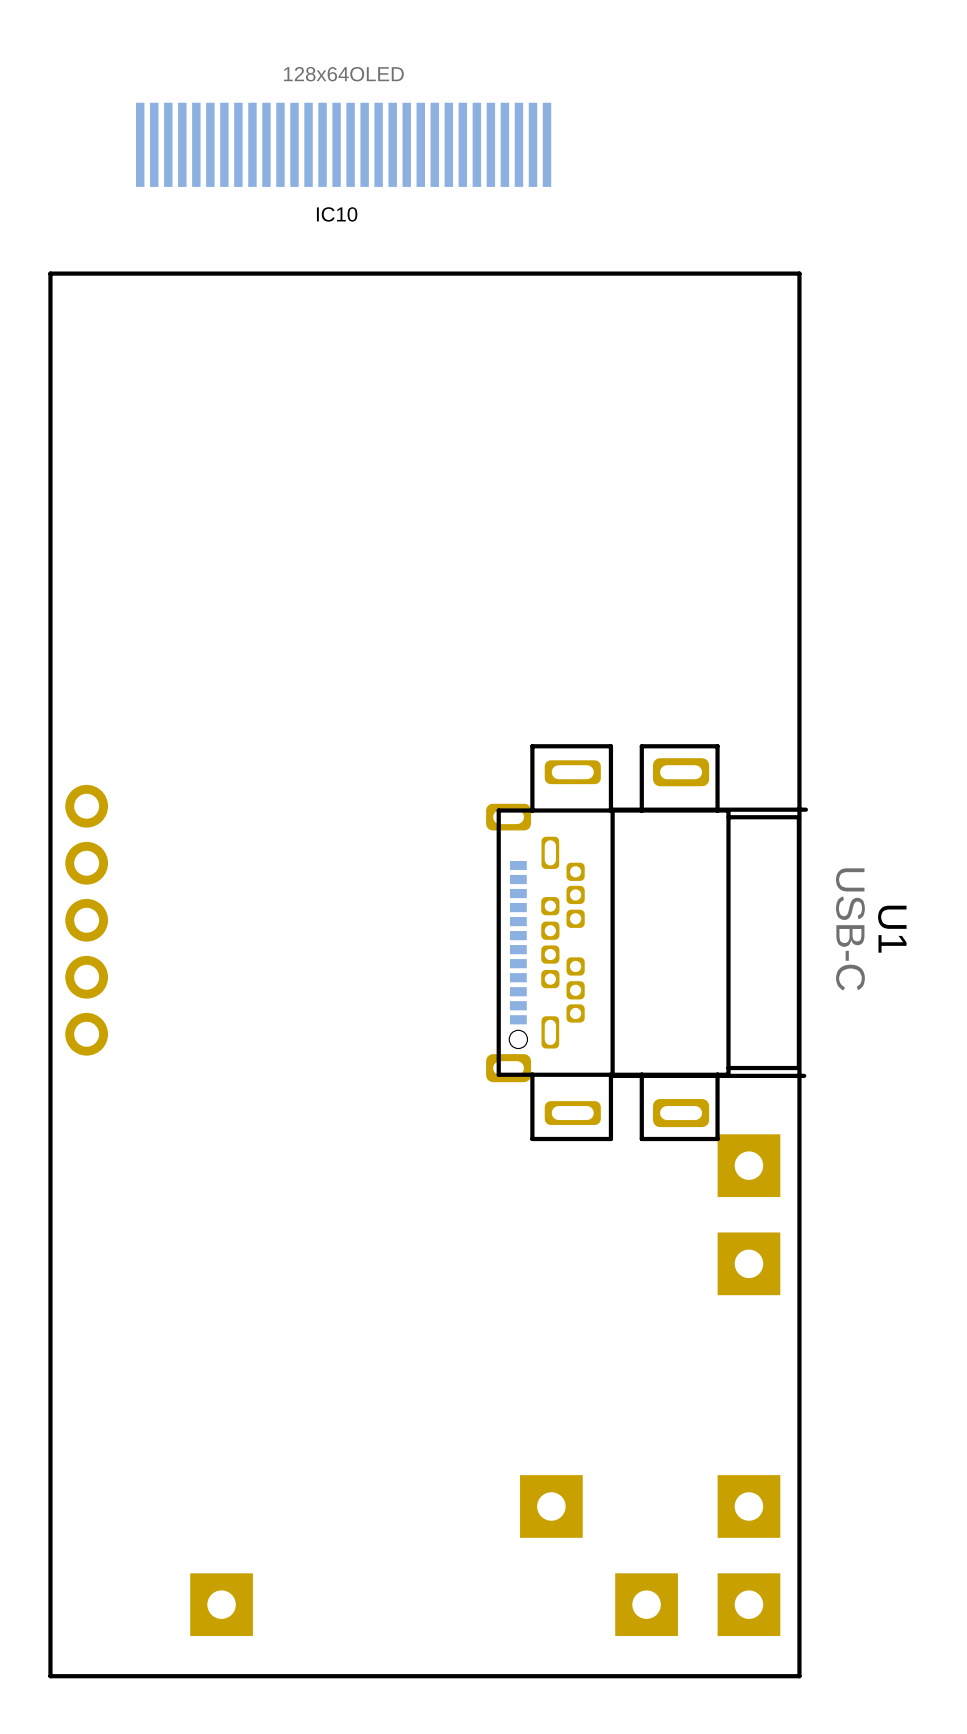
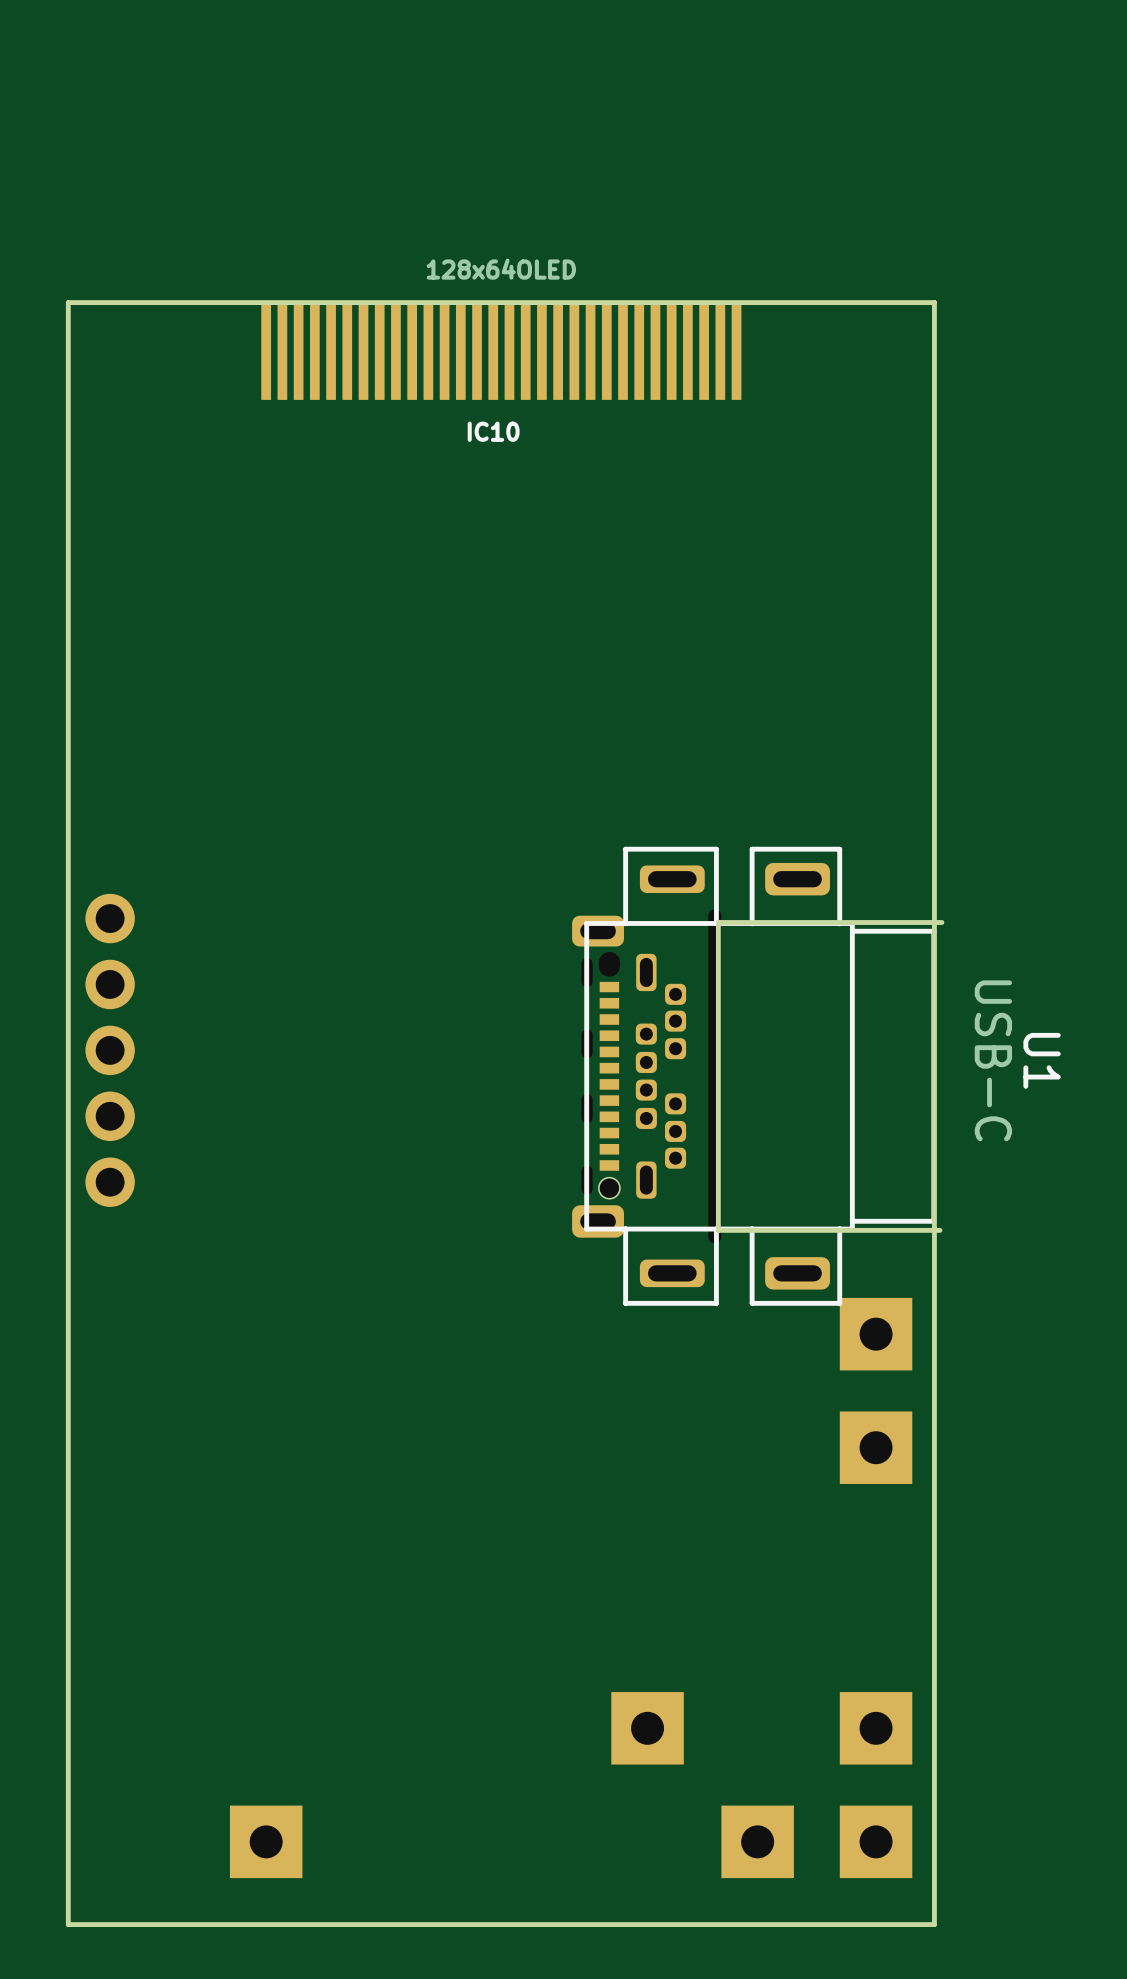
IC10 position: (343, 144) -> (501, 351)

